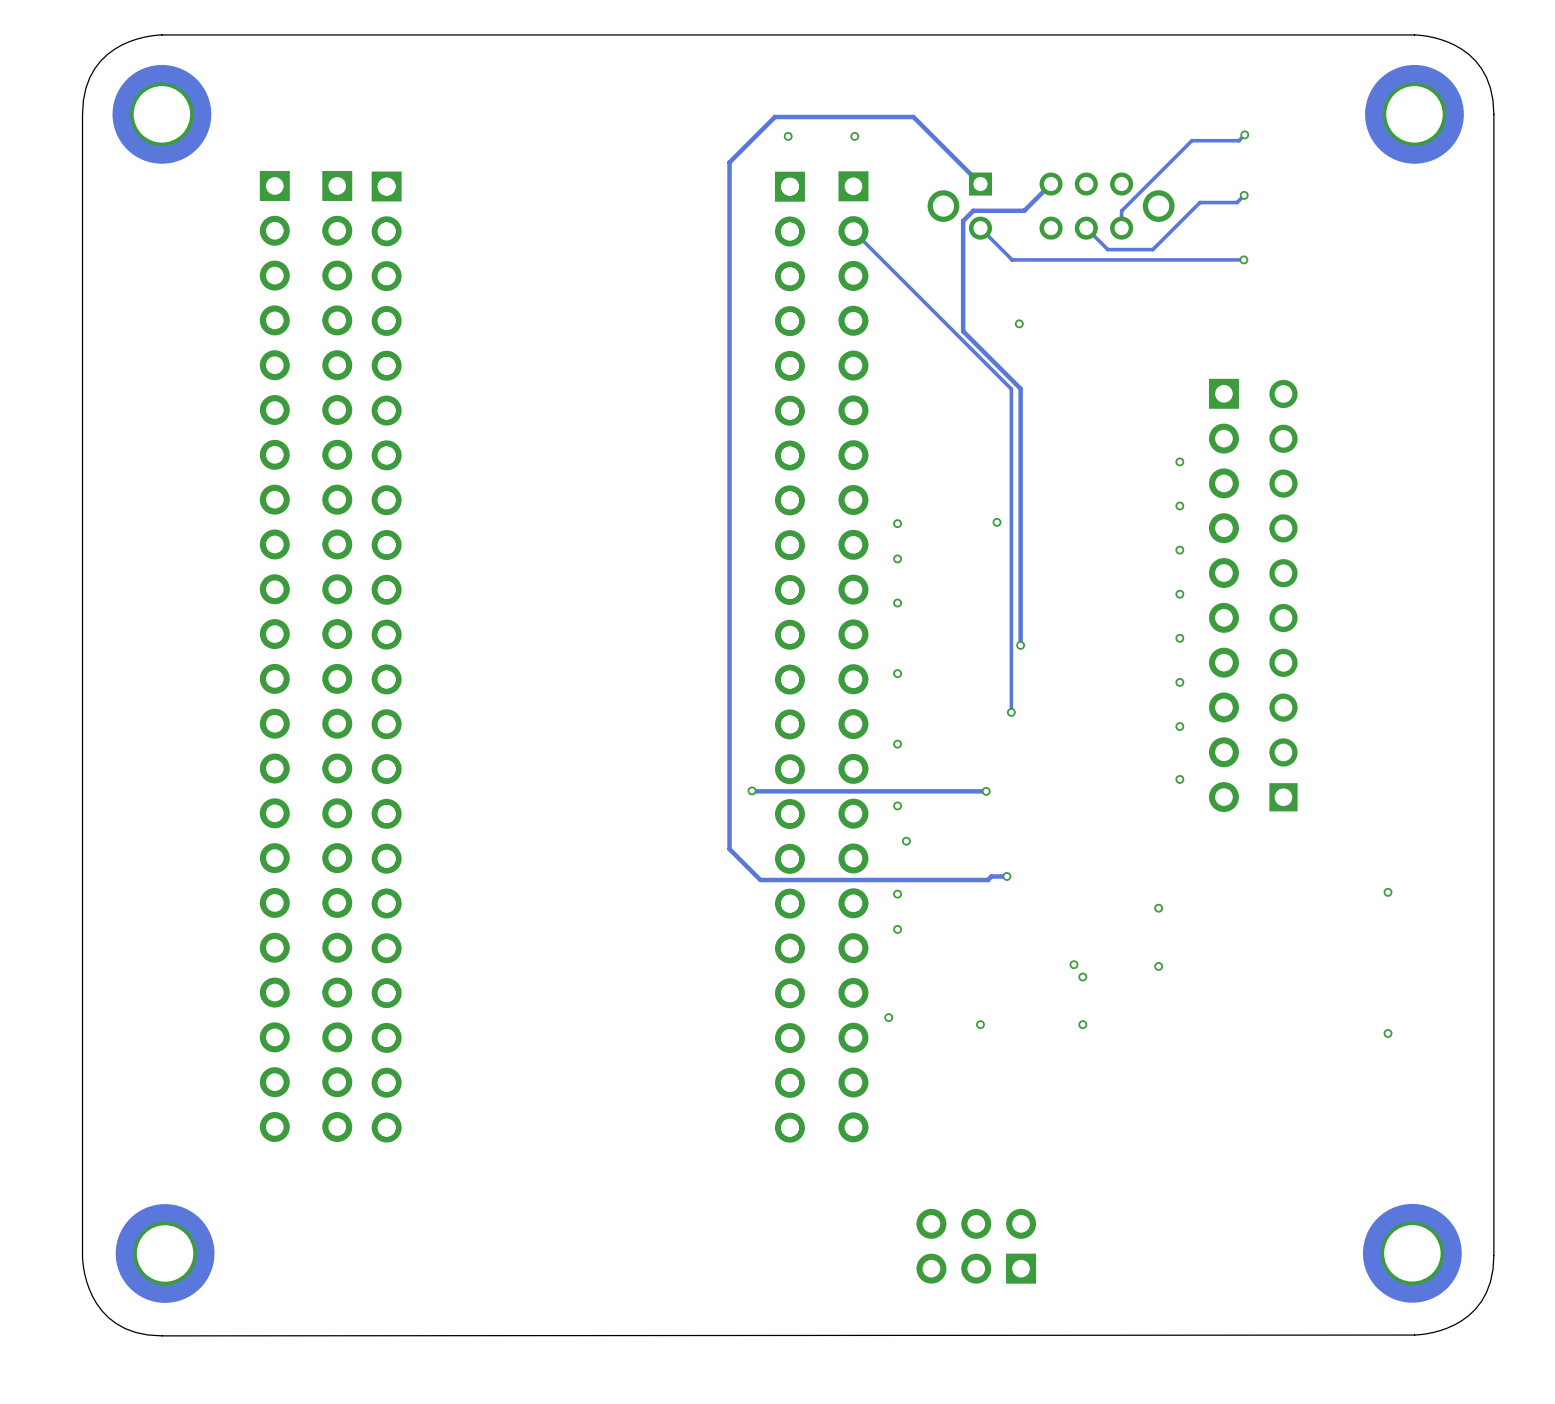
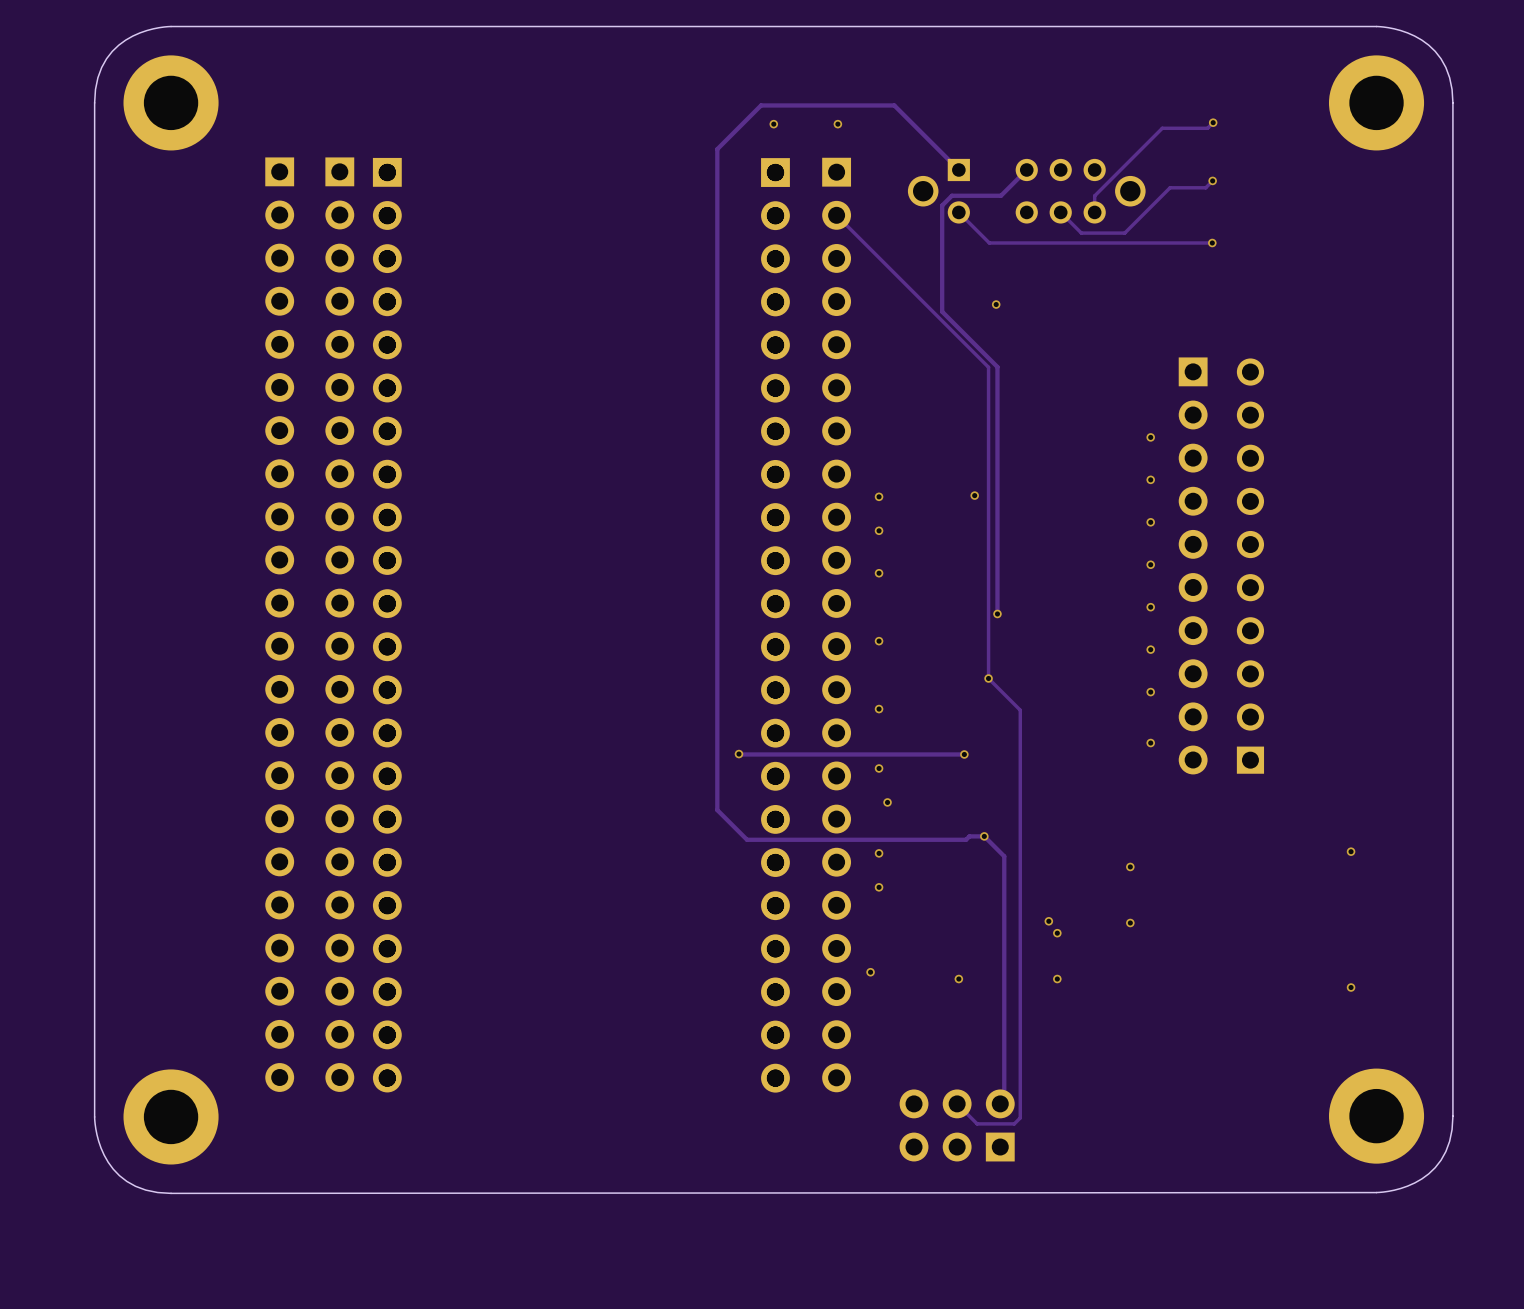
track: none -> (988, 678) (1020, 710) (1020, 1117) (1014, 1123) (977, 1123) (957, 1103)
track: none -> (984, 836) (1004, 856) (1004, 1099) (1000, 1103)
board edge: (1493, 1167) (1493, 1255) -> (1452, 1116) (1449, 1141) (1445, 1151) (1435, 1167) (1421, 1178) (1407, 1186) (1376, 1192)
board edge: (82, 1168) (82, 1256) -> (94, 1116) (101, 1148) (108, 1162) (119, 1175) (135, 1186) (145, 1190) (171, 1193) (1376, 1192)
part position: (976, 1246) -> (957, 1125)
part position: (165, 1253) -> (171, 1116)
part position: (1412, 1253) -> (1376, 1116)
board edge: (1493, 1255) (1490, 1281) (1486, 1292) (1475, 1309) (1461, 1320) (1446, 1328) (1414, 1334) -> none
board edge: (82, 1256) (89, 1288) (96, 1303) (108, 1317) (125, 1328) (135, 1332) (161, 1335) -> none
board edge: (1414, 1335) (162, 1335) -> none

